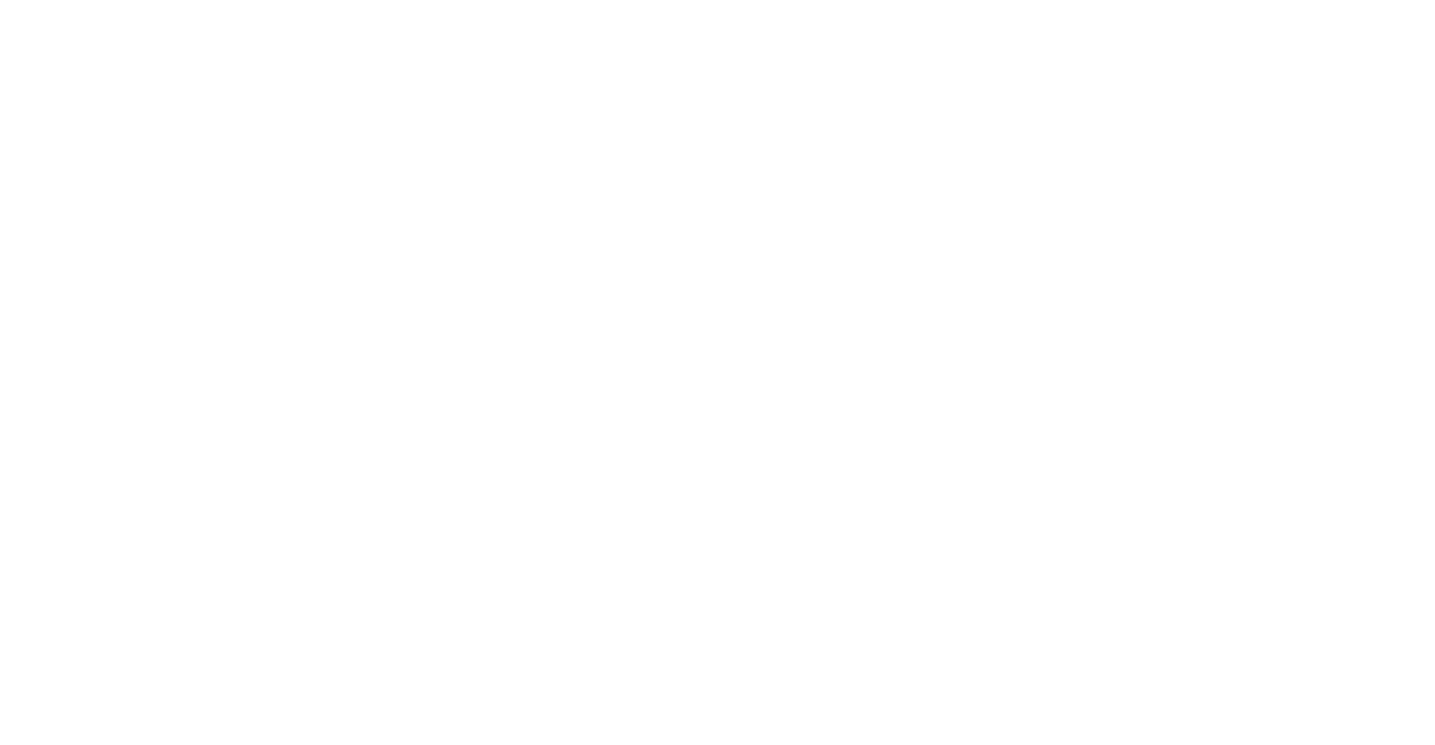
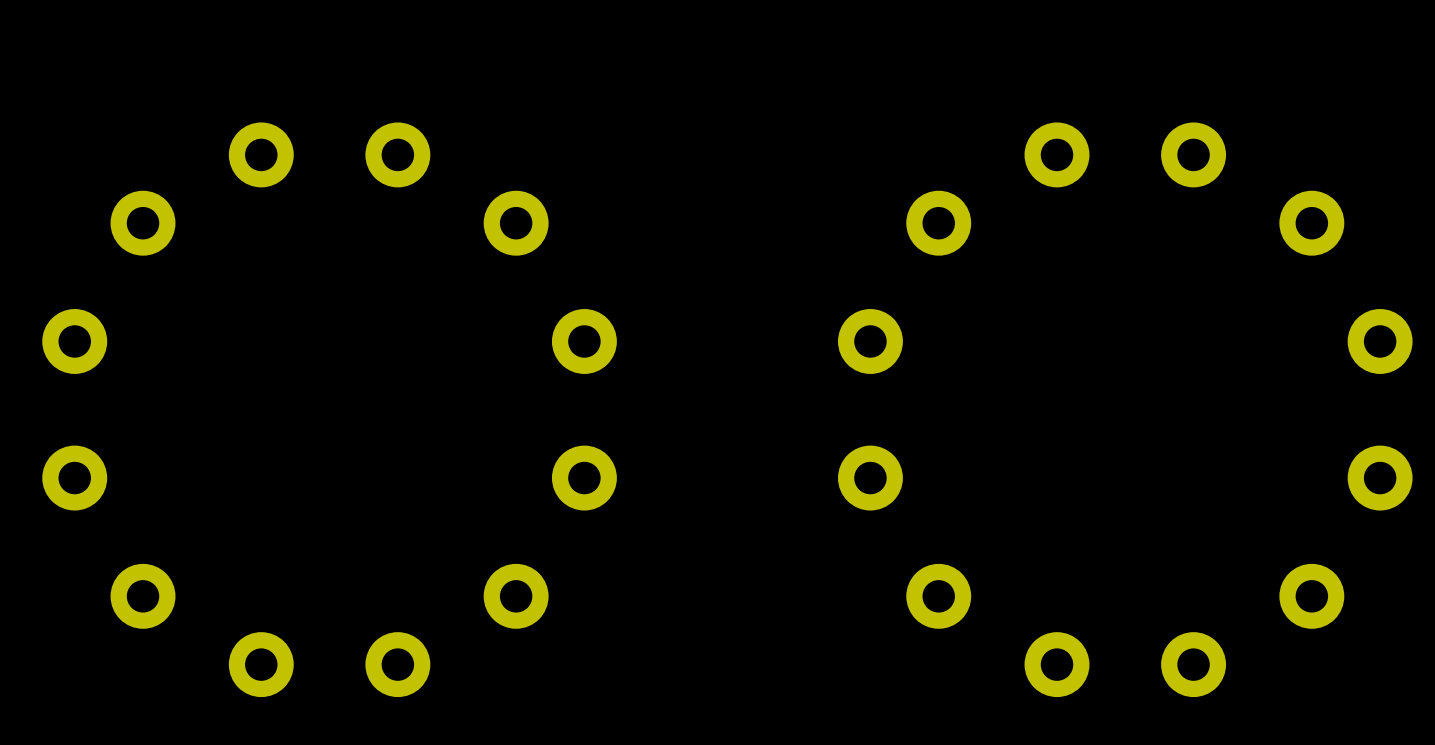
part: none -> (329, 409)
part: none -> (1125, 409)

